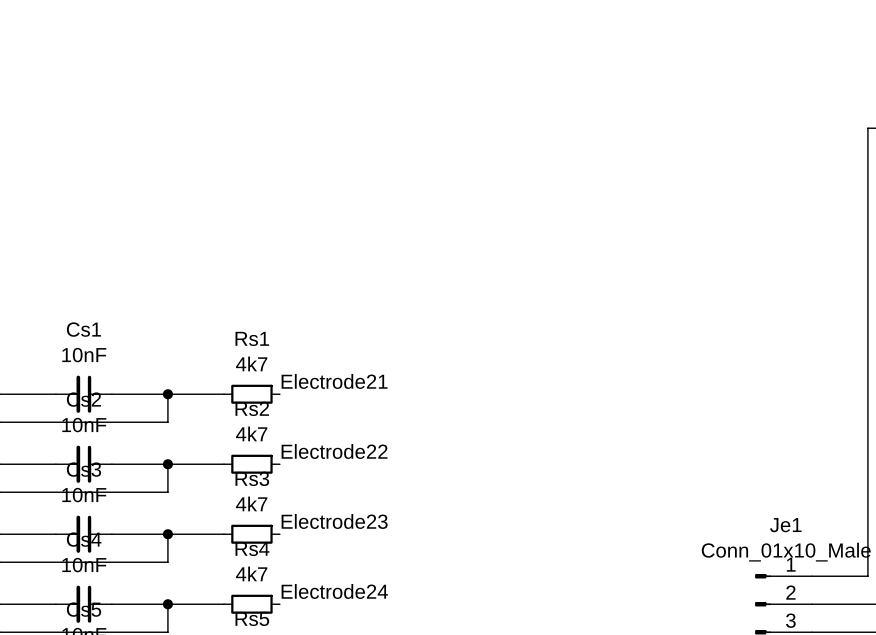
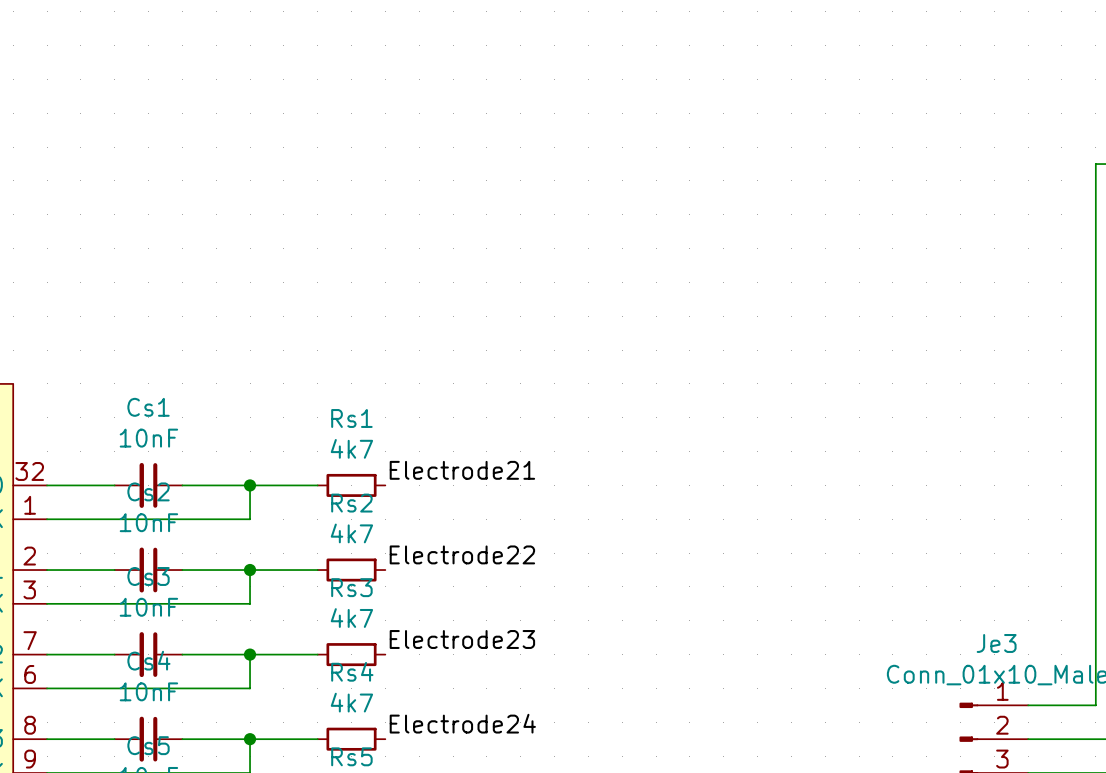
Je1 name: Je1 (785, 525) -> Je3 (996, 643)

